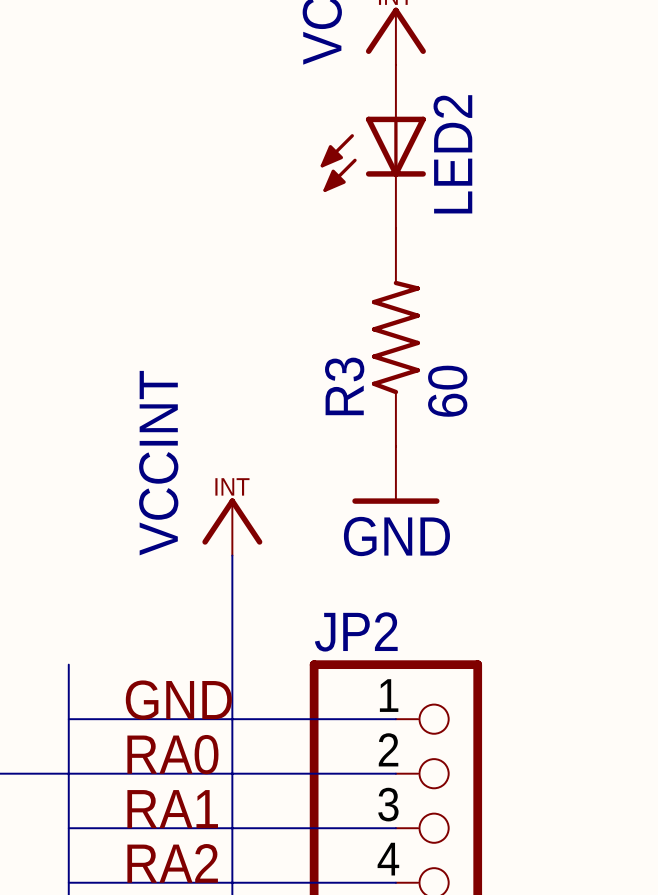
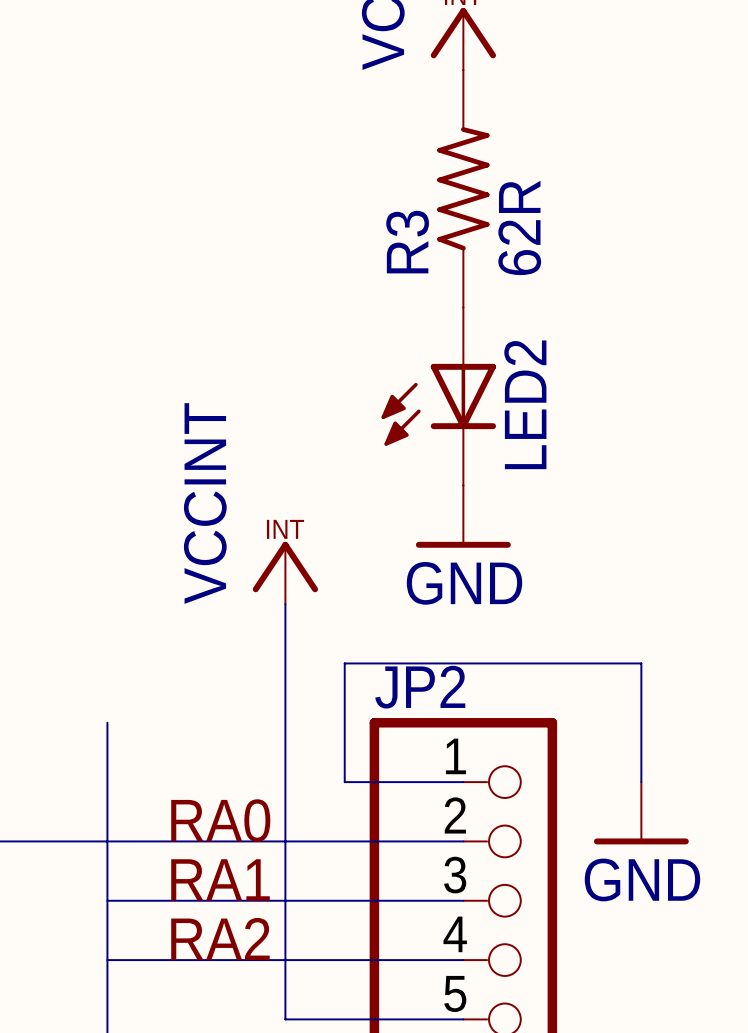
LED2 position: (373, 146) -> (438, 396)
R3 position: (395, 337) -> (463, 188)
R3 value: 60 (447, 391) -> 62R (519, 227)
label: GND (178, 700) -> none
wire: (68, 719) (286, 719) -> (641, 782) (641, 663) (344, 663) (344, 782)
power symbol: none -> GND (641, 813)

